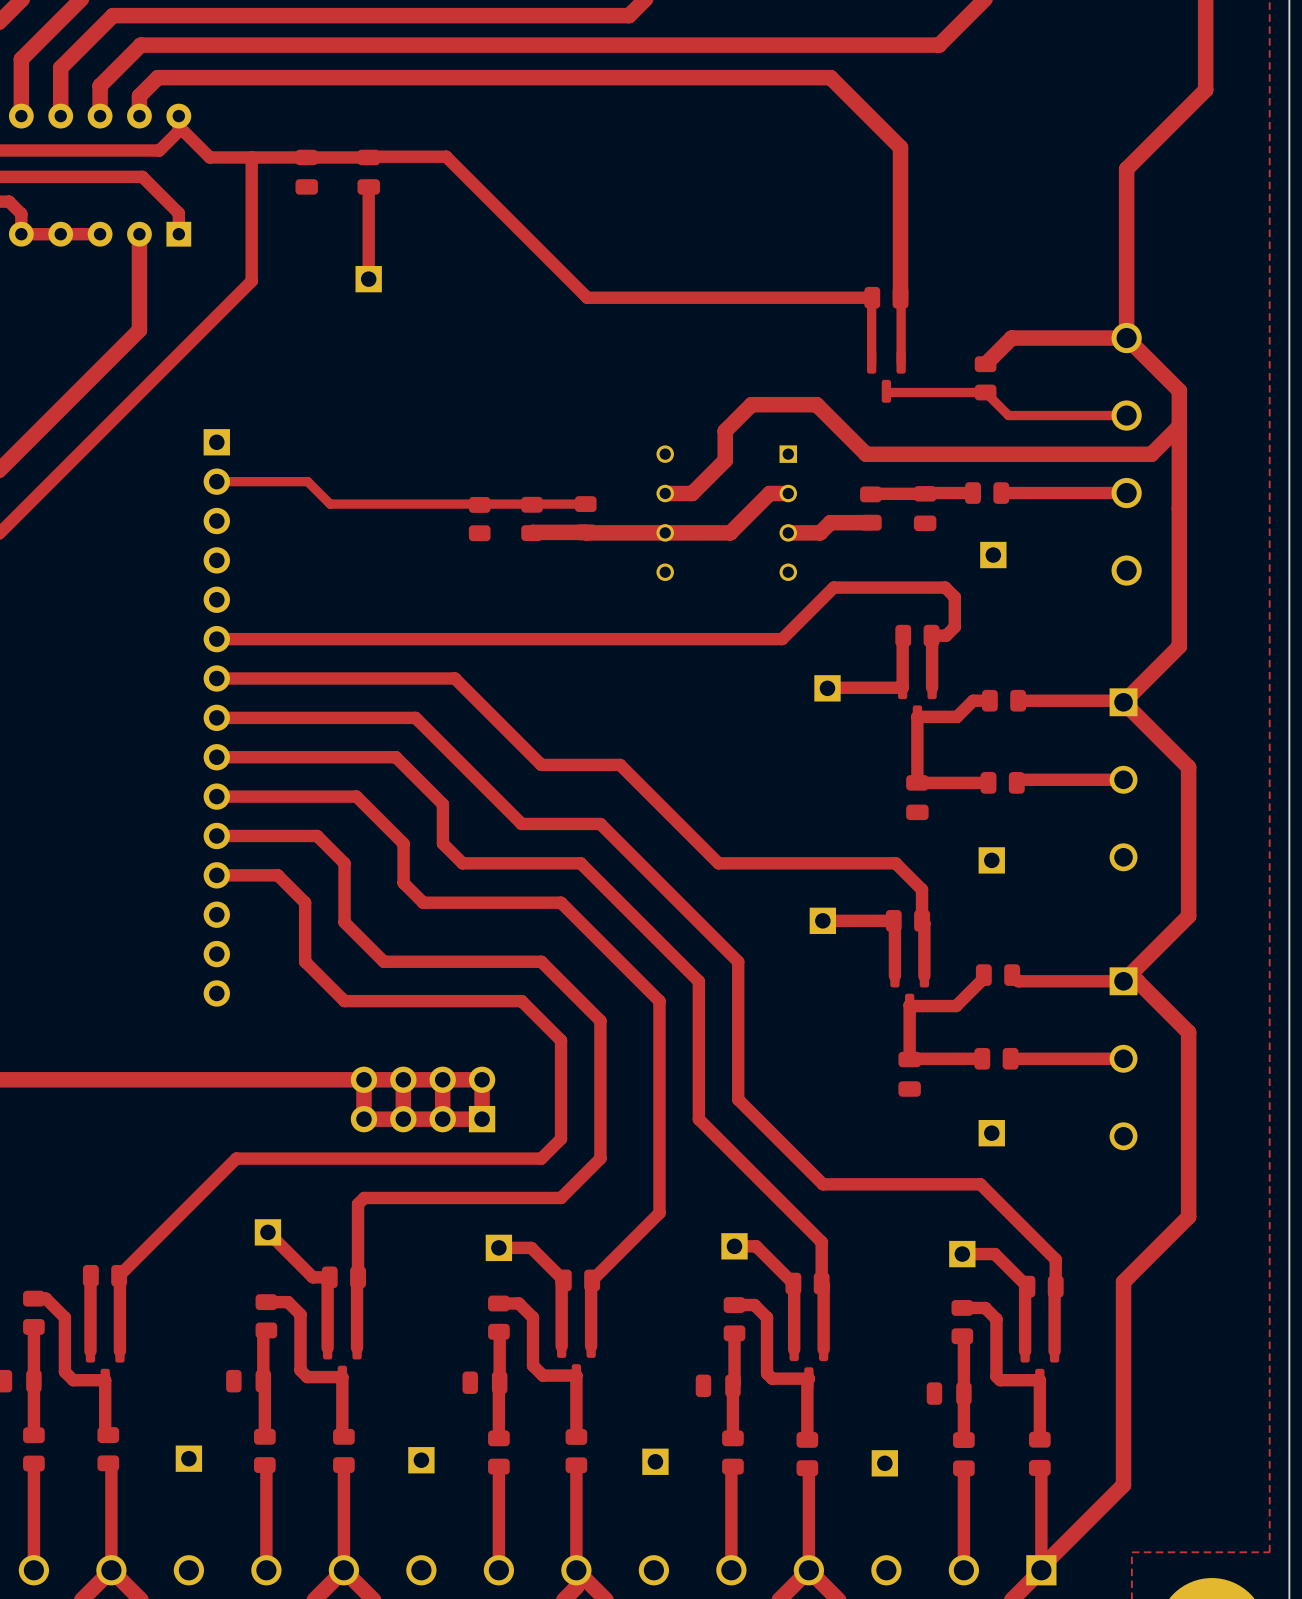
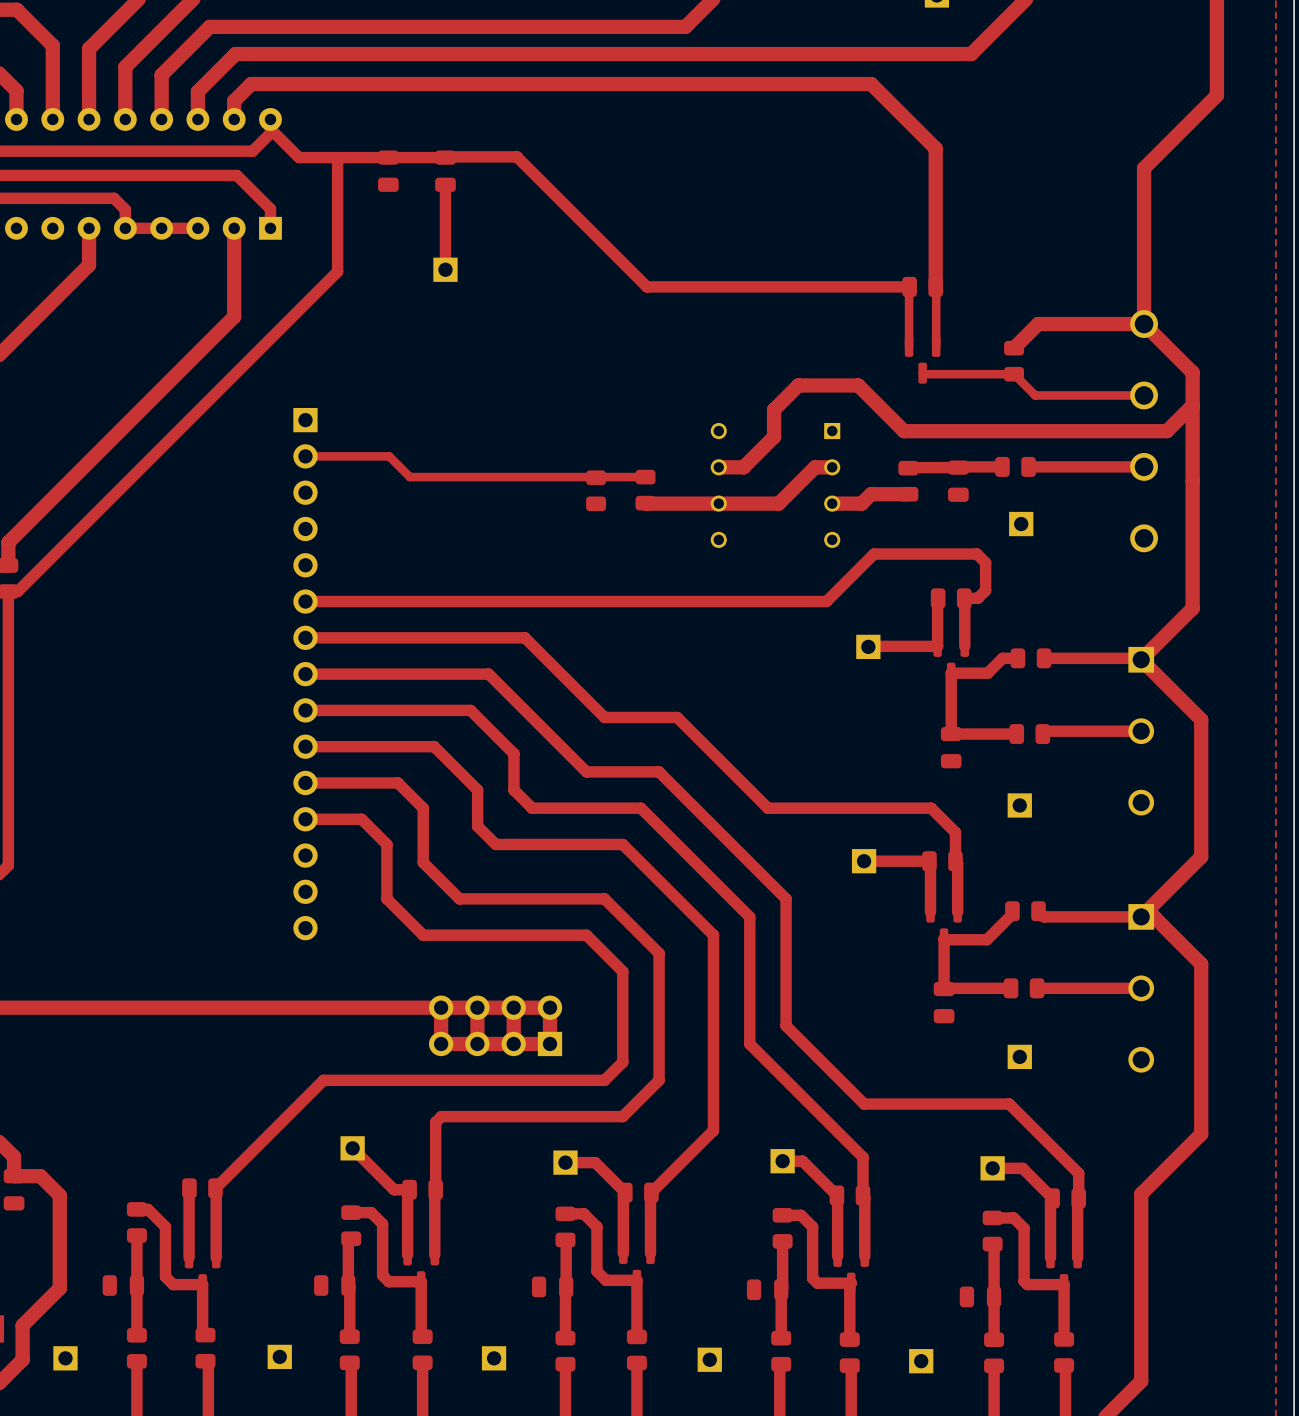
part: (479, 519) -> none
top track: (585, 532) (532, 533) -> none

